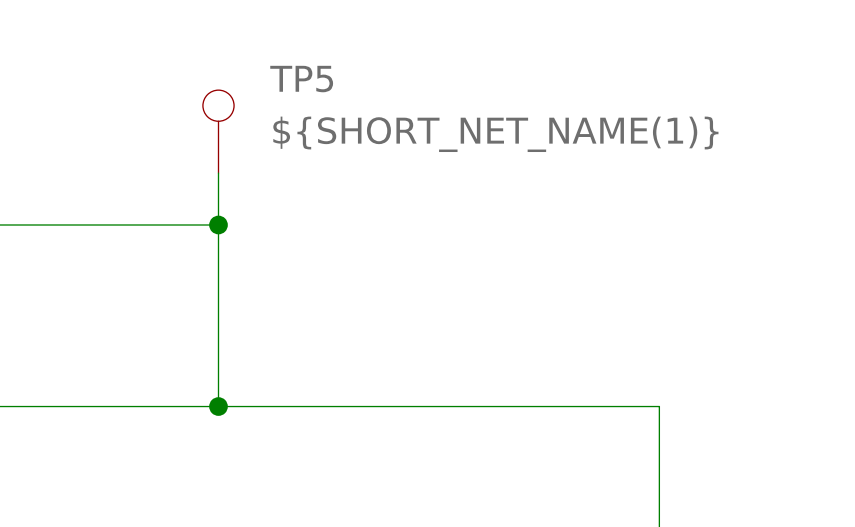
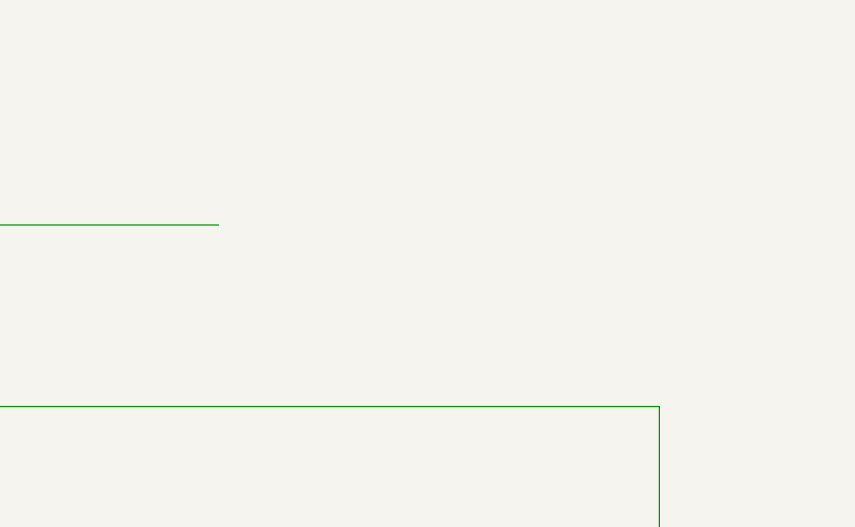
TP5: ${SHORT_NET_NAME(1)} (218, 131) -> none
wire: (218, 173) (218, 406) -> none
junction: (218, 224) -> none
junction: (218, 406) -> none

